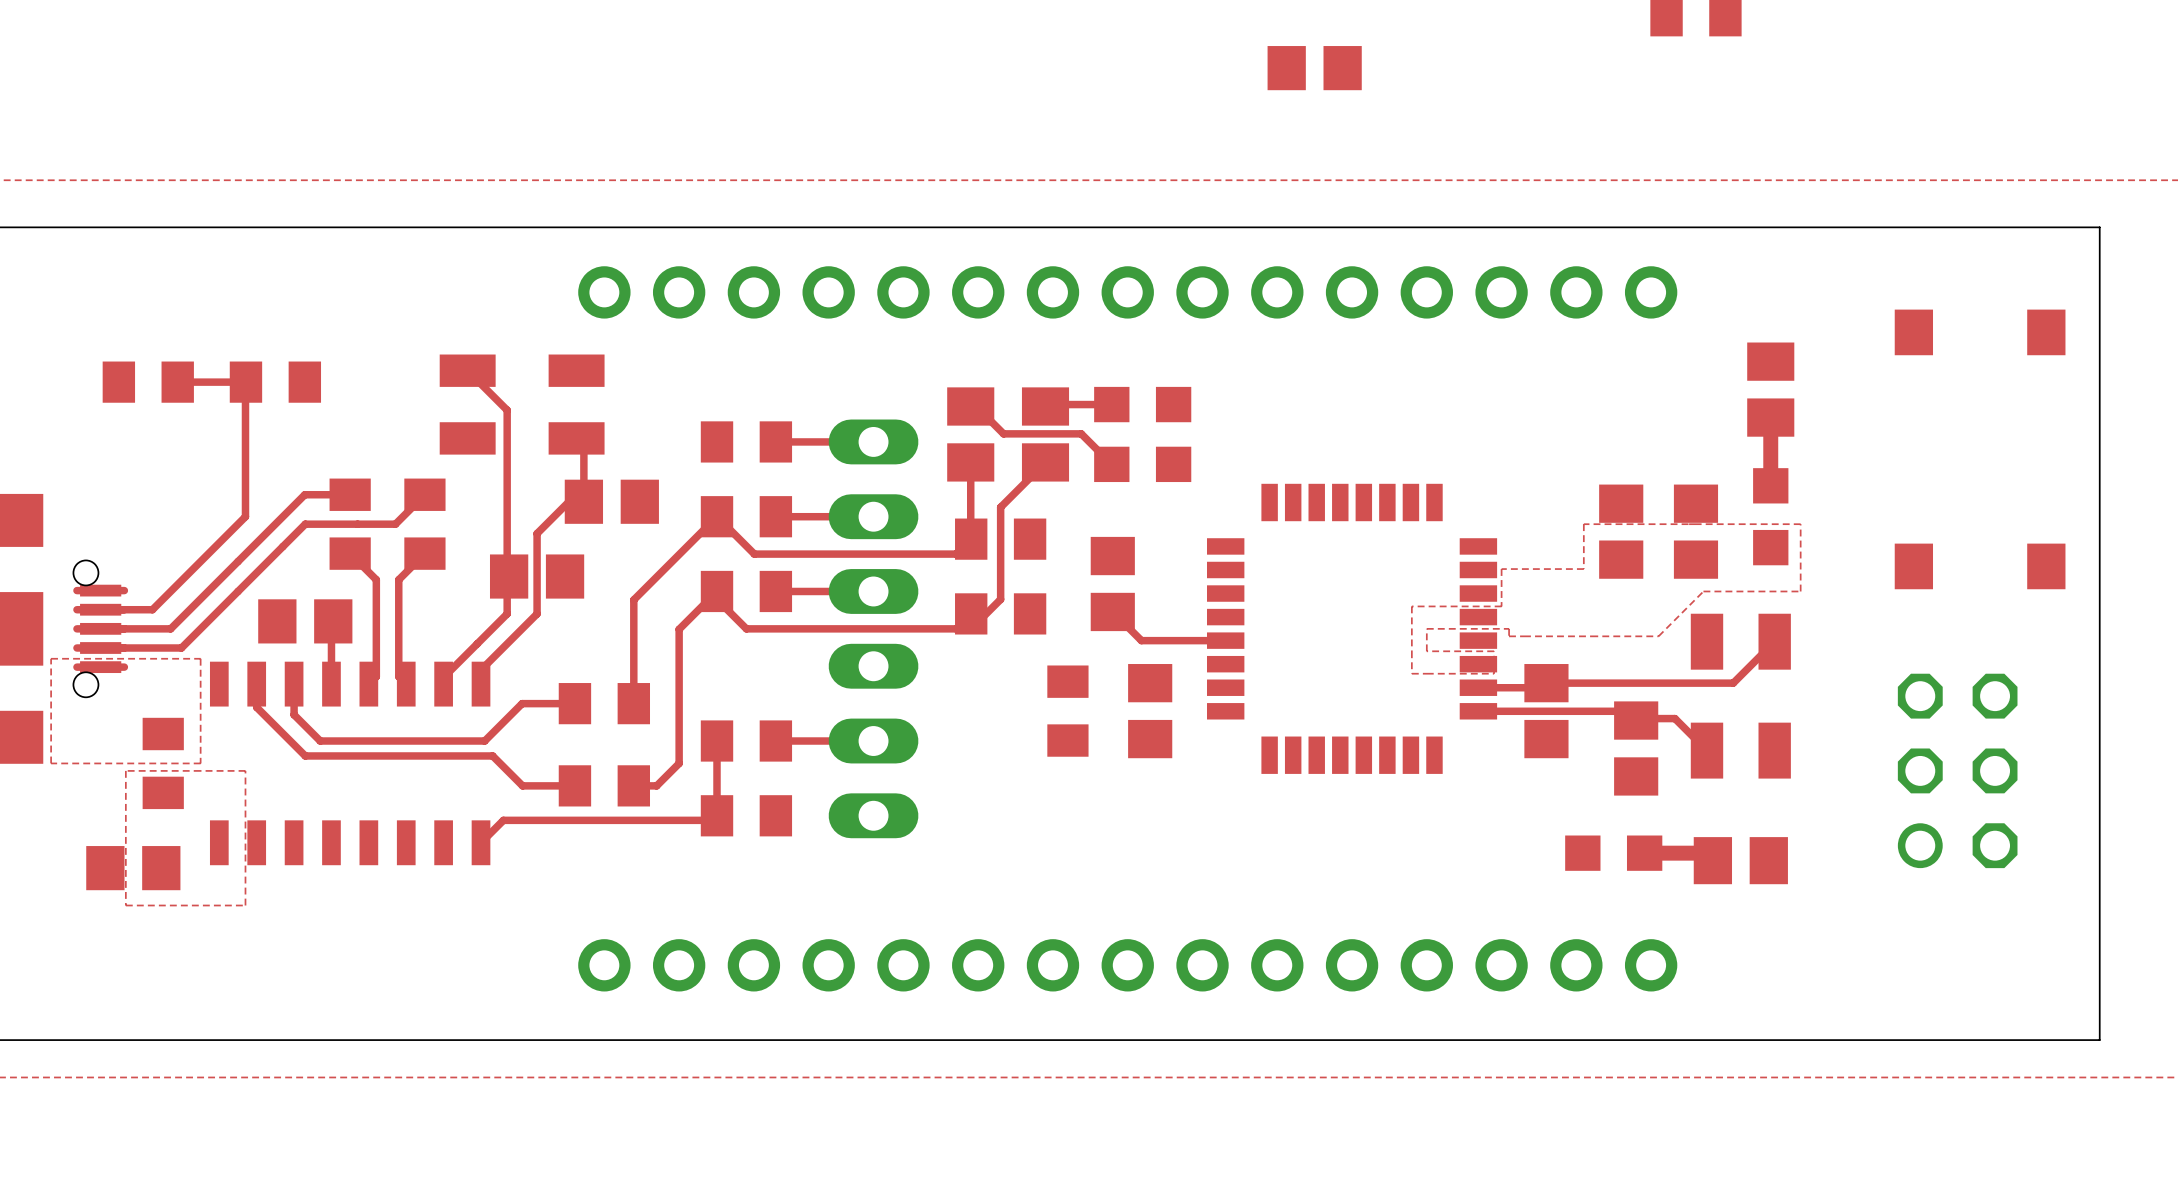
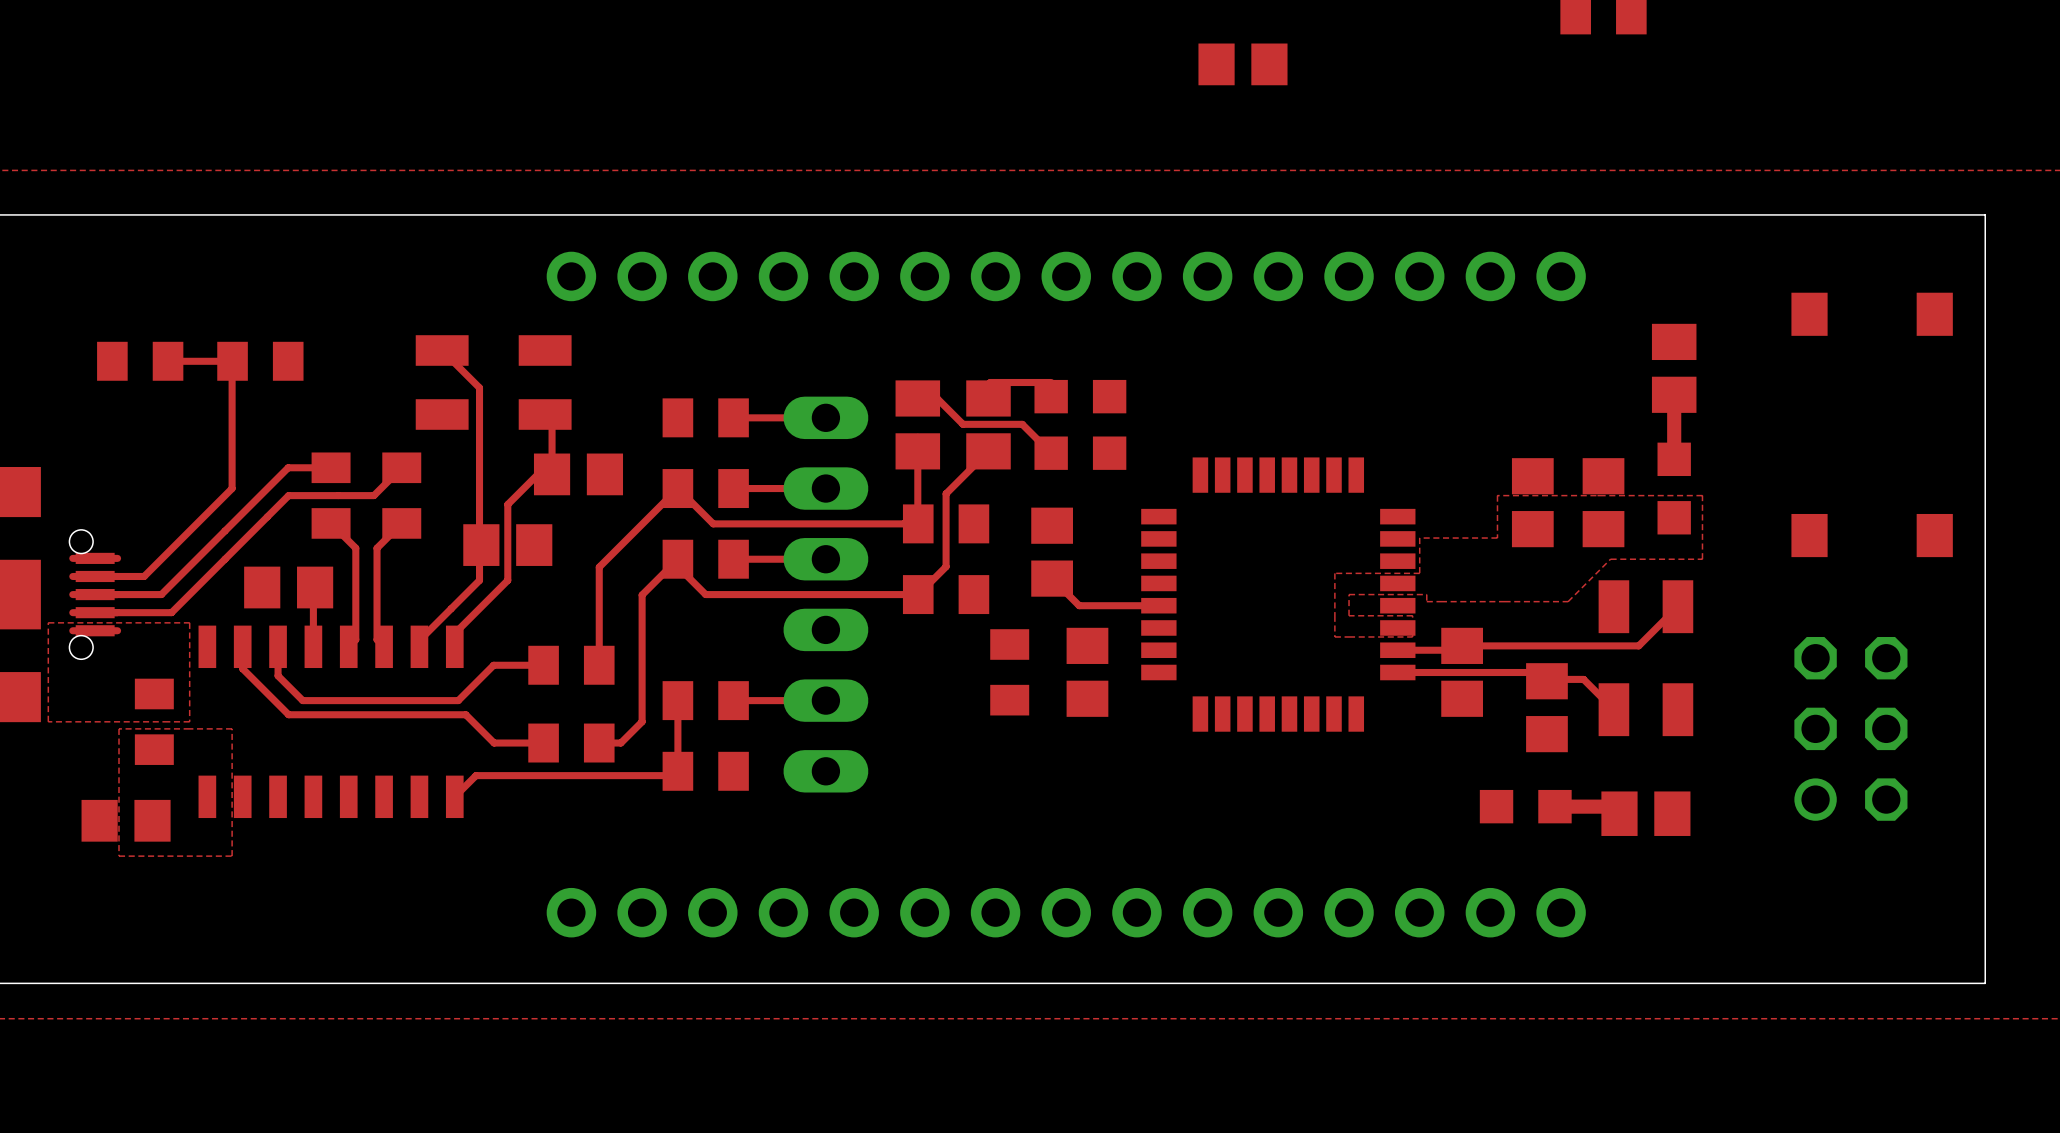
part position: (1142, 404) -> (1080, 396)
top track: (1003, 433) (1081, 433) (1111, 464) -> (948, 410) (963, 424) (1022, 424) (1051, 453)
part position: (970, 434) -> (917, 424)
part position: (1045, 434) -> (988, 424)
top track: (1045, 462) (1000, 507) (1000, 522) -> (988, 451) (946, 493)
part position: (1142, 464) -> (1080, 453)
part position: (1000, 539) -> (946, 523)
part position: (1000, 613) -> (946, 594)

